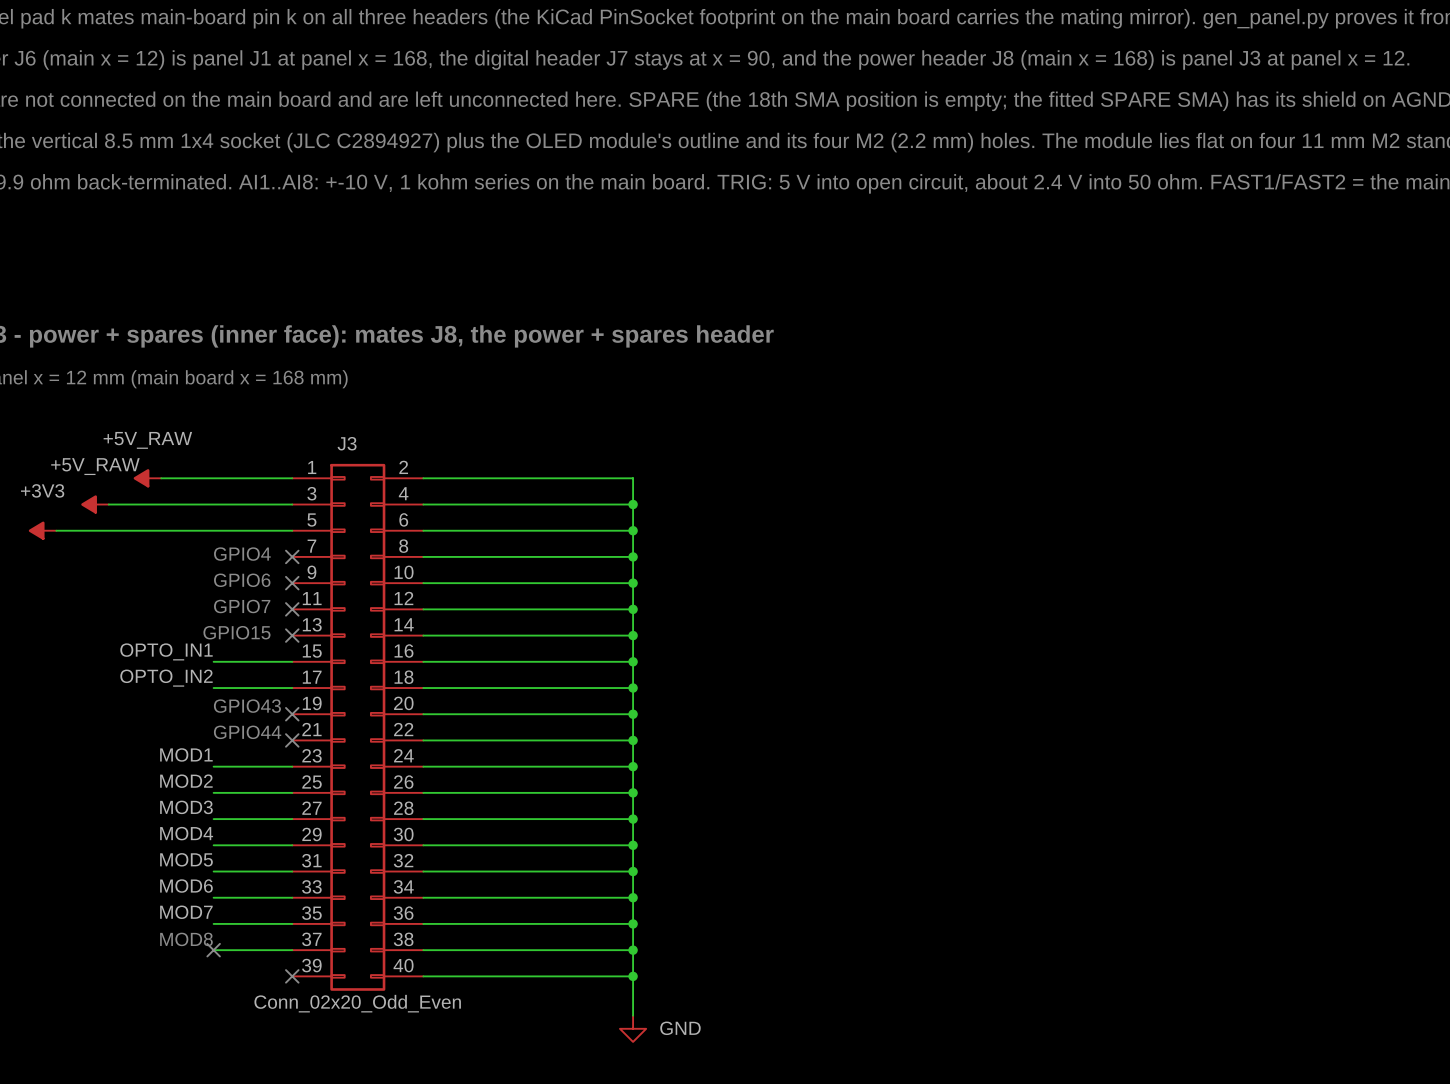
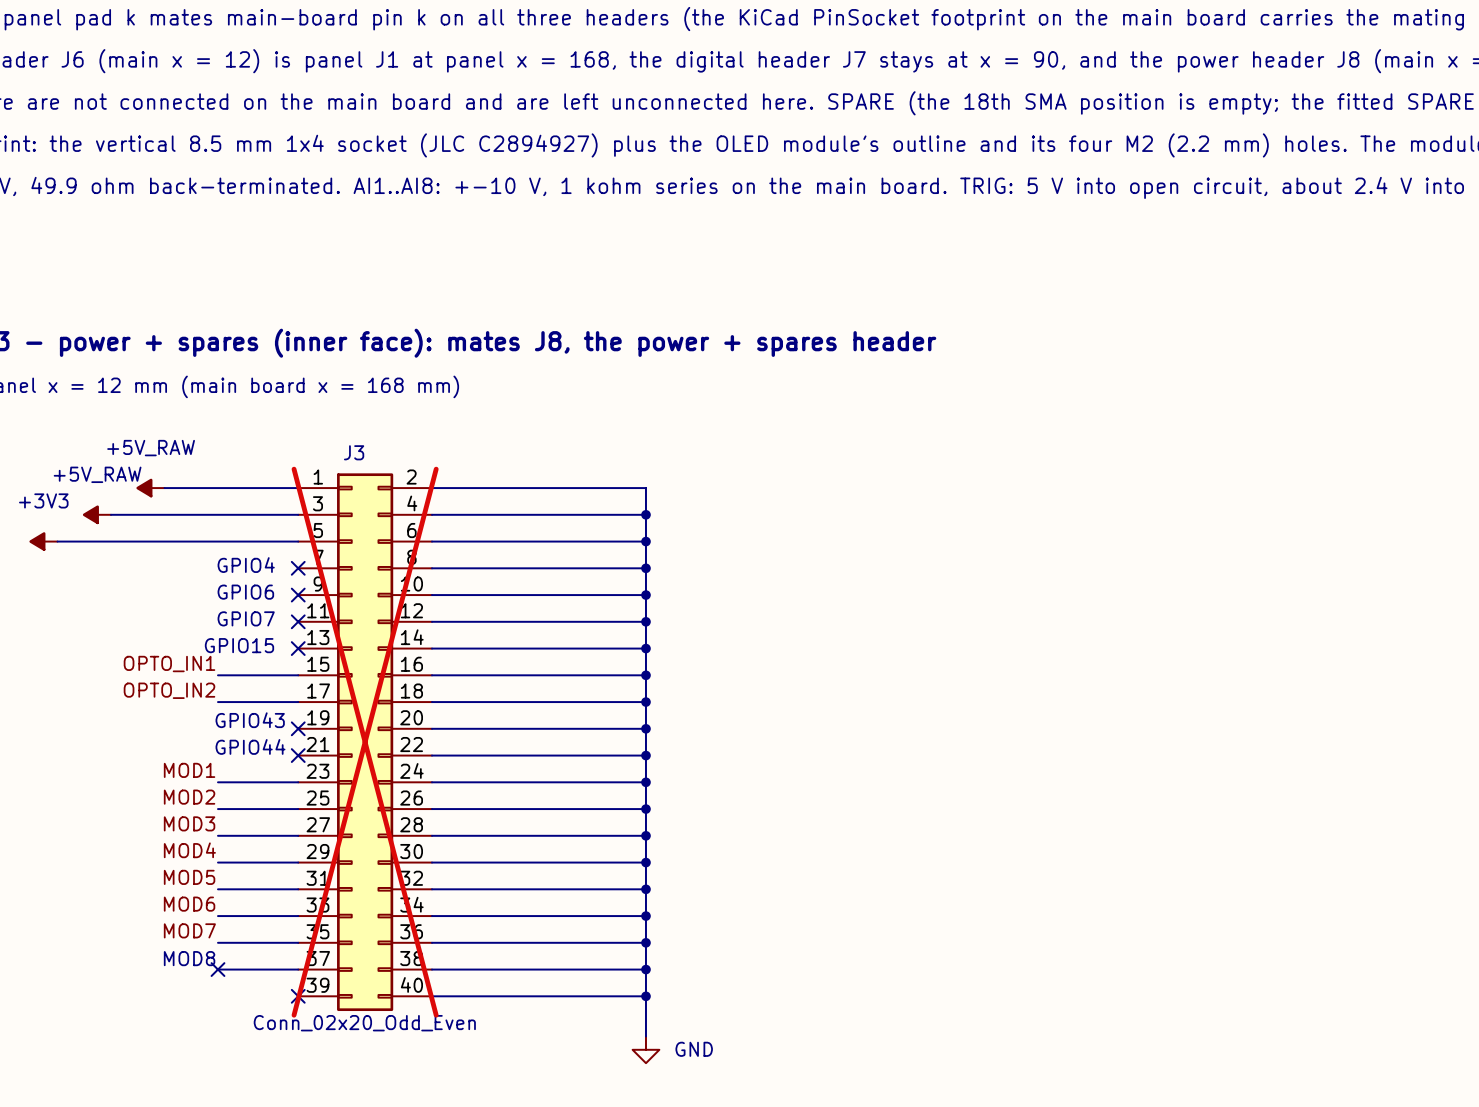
J3 do-not-place cross: none -> (365, 742)

